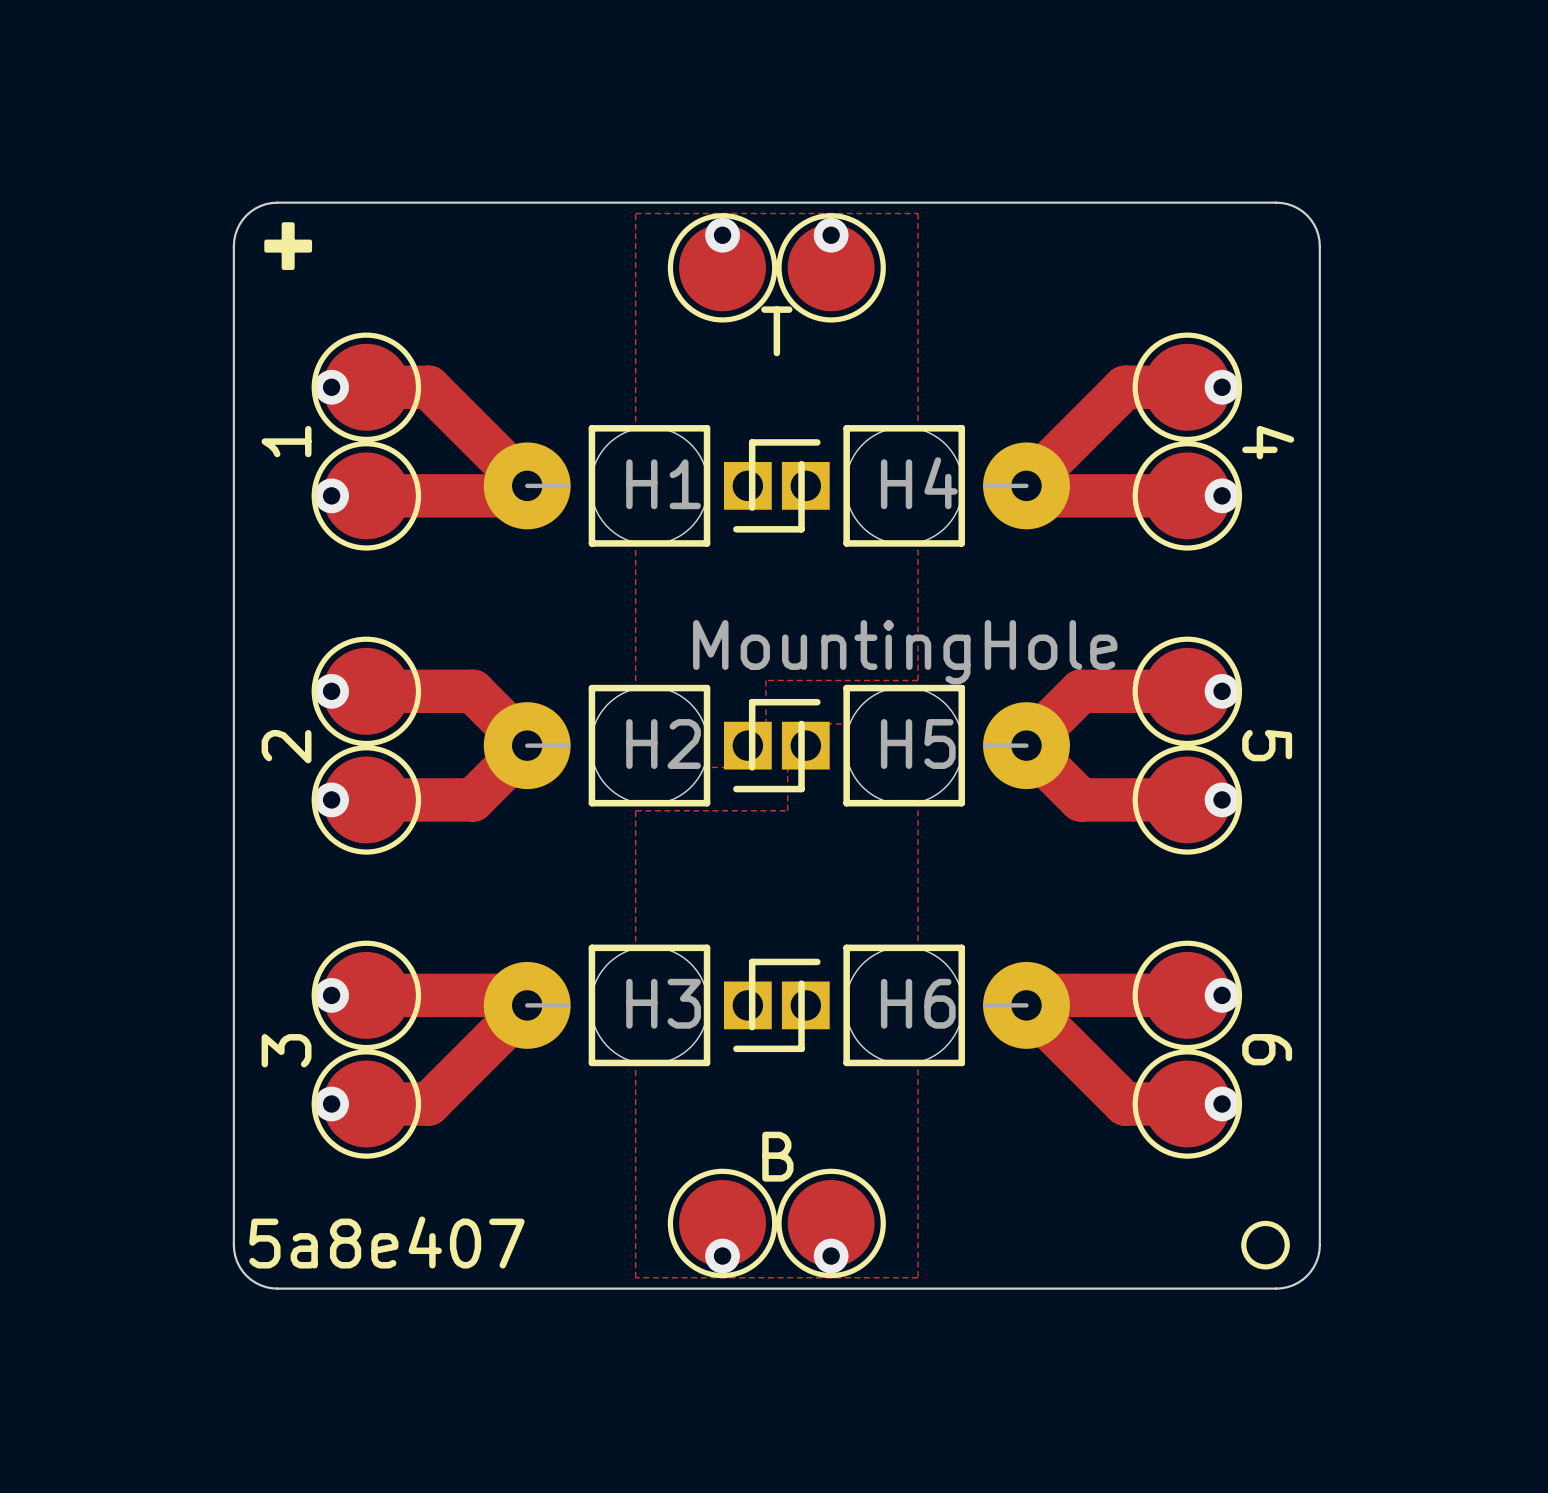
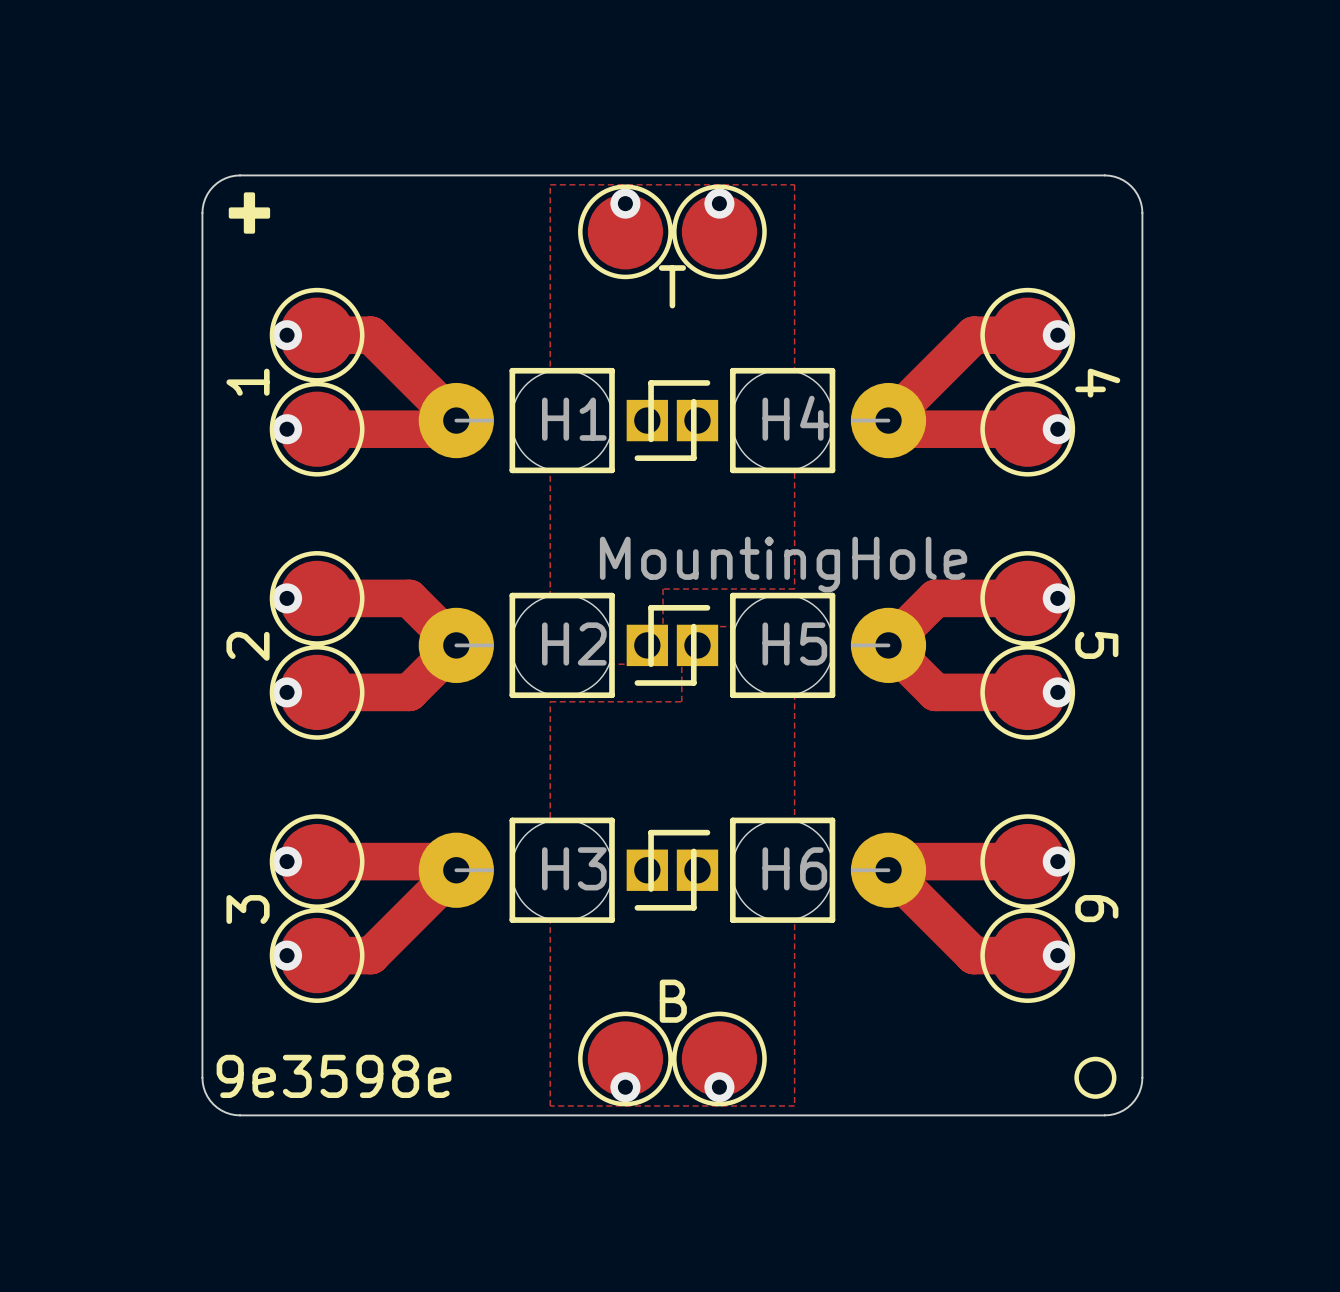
text: 5a8e407 (386, 1242) -> 9e3598e (334, 1076)

